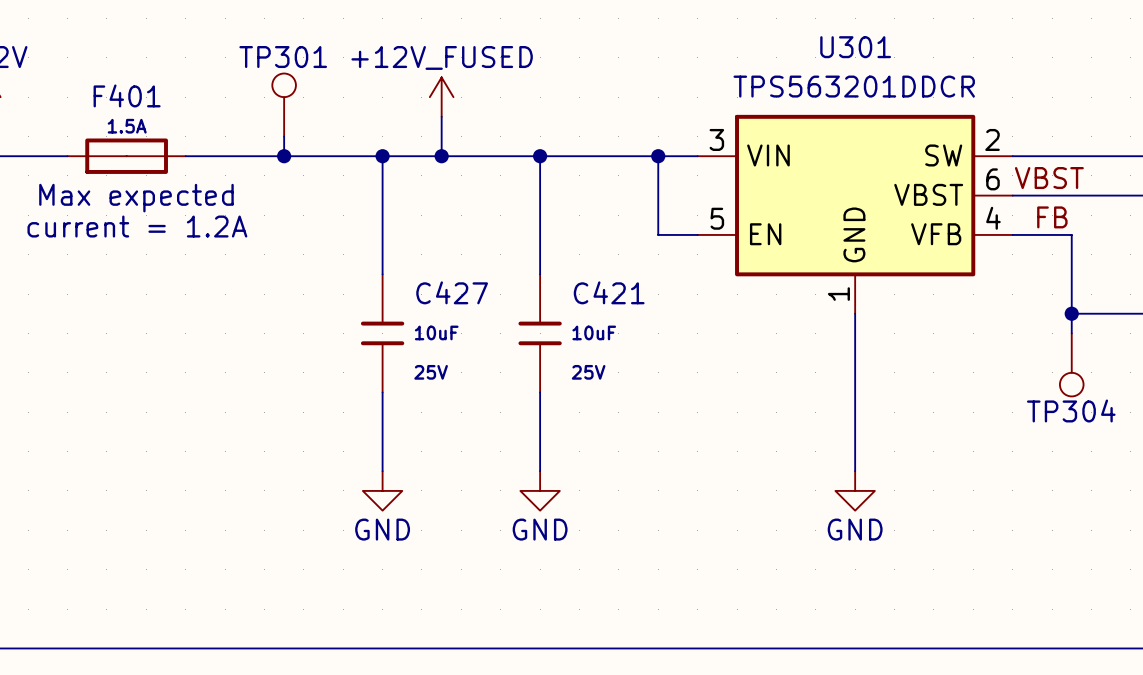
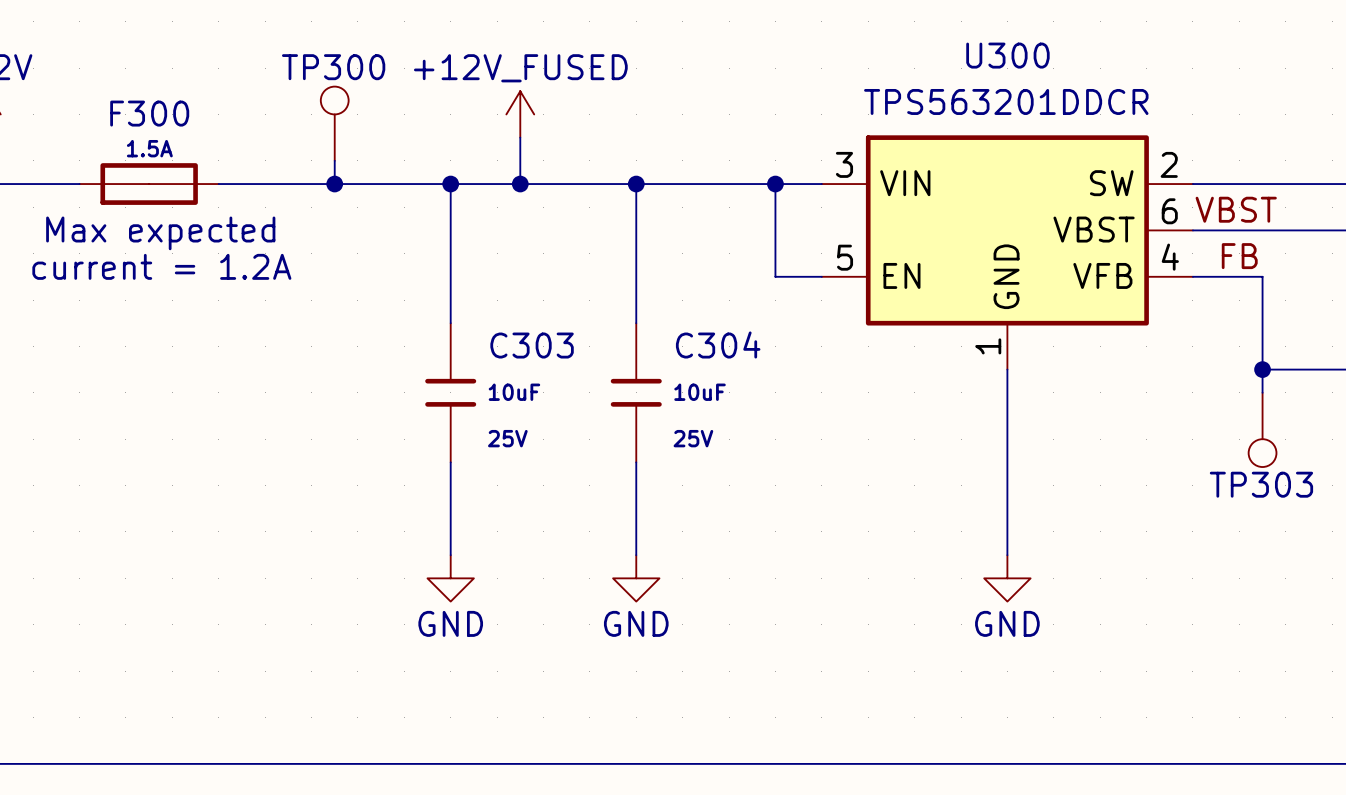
U301 name: U301 (855, 47) -> U300 (1007, 55)
TP301 name: TP301 (283, 57) -> TP300 (333, 67)
F401 name: F401 (127, 95) -> F300 (149, 113)
C427 name: C427 (452, 292) -> C303 (532, 345)
C421 name: C421 (609, 292) -> C304 (718, 344)
TP304 name: TP304 (1071, 410) -> TP303 (1261, 484)

